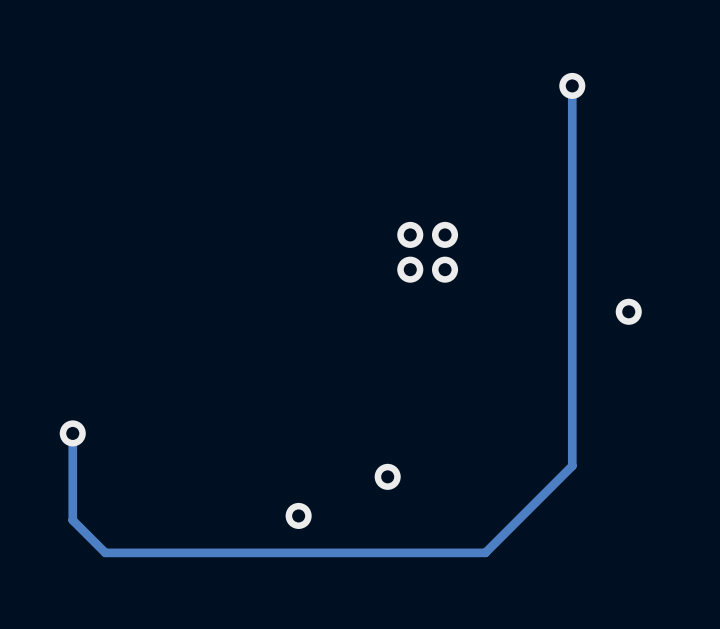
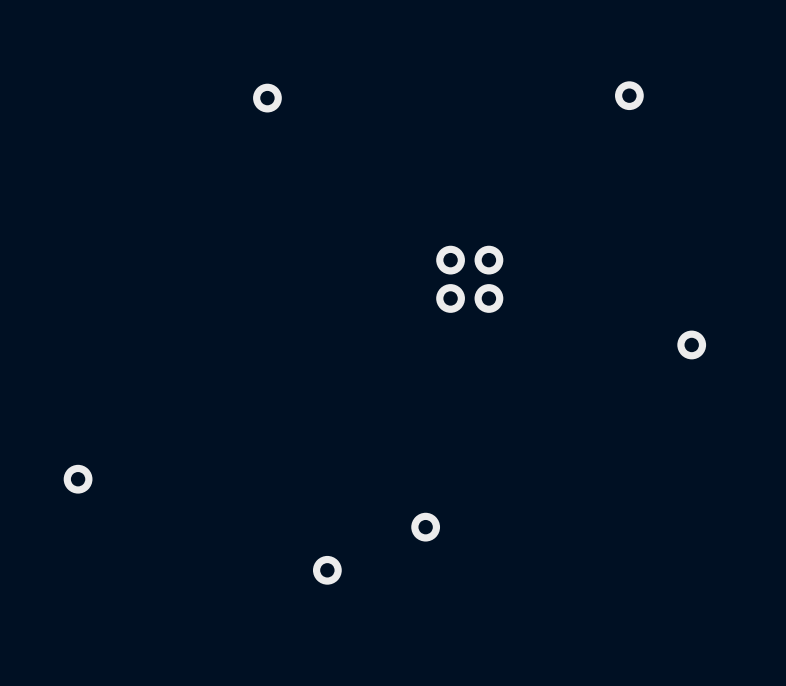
track: (572, 85) (572, 465) (485, 552) (105, 552) (72, 520) (72, 433) -> none
via: none -> (267, 98)

